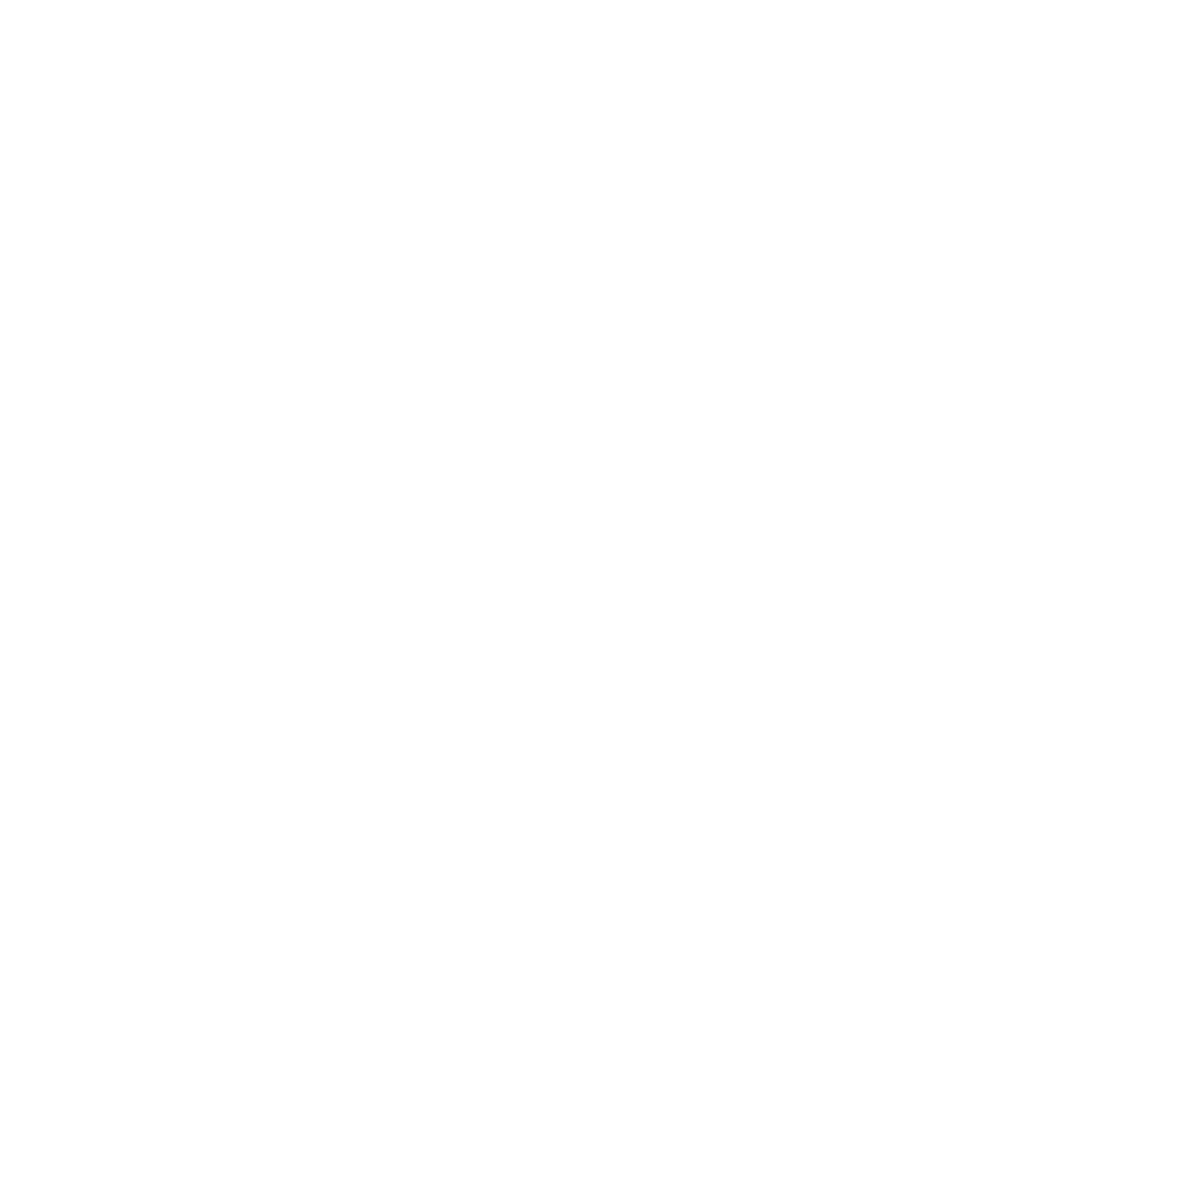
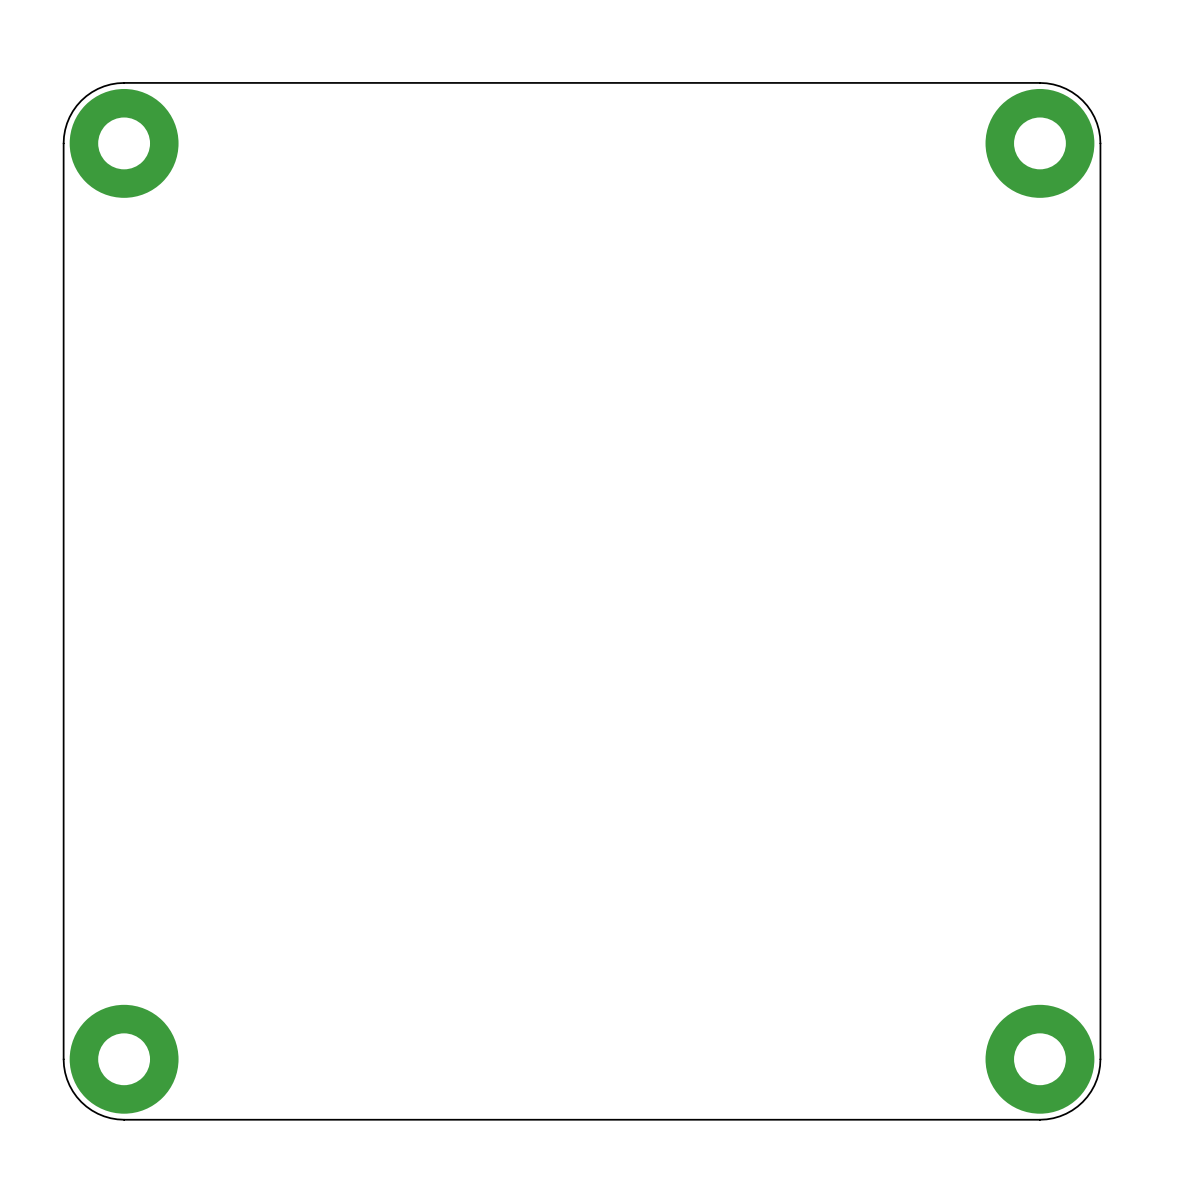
part: none -> (582, 601)

